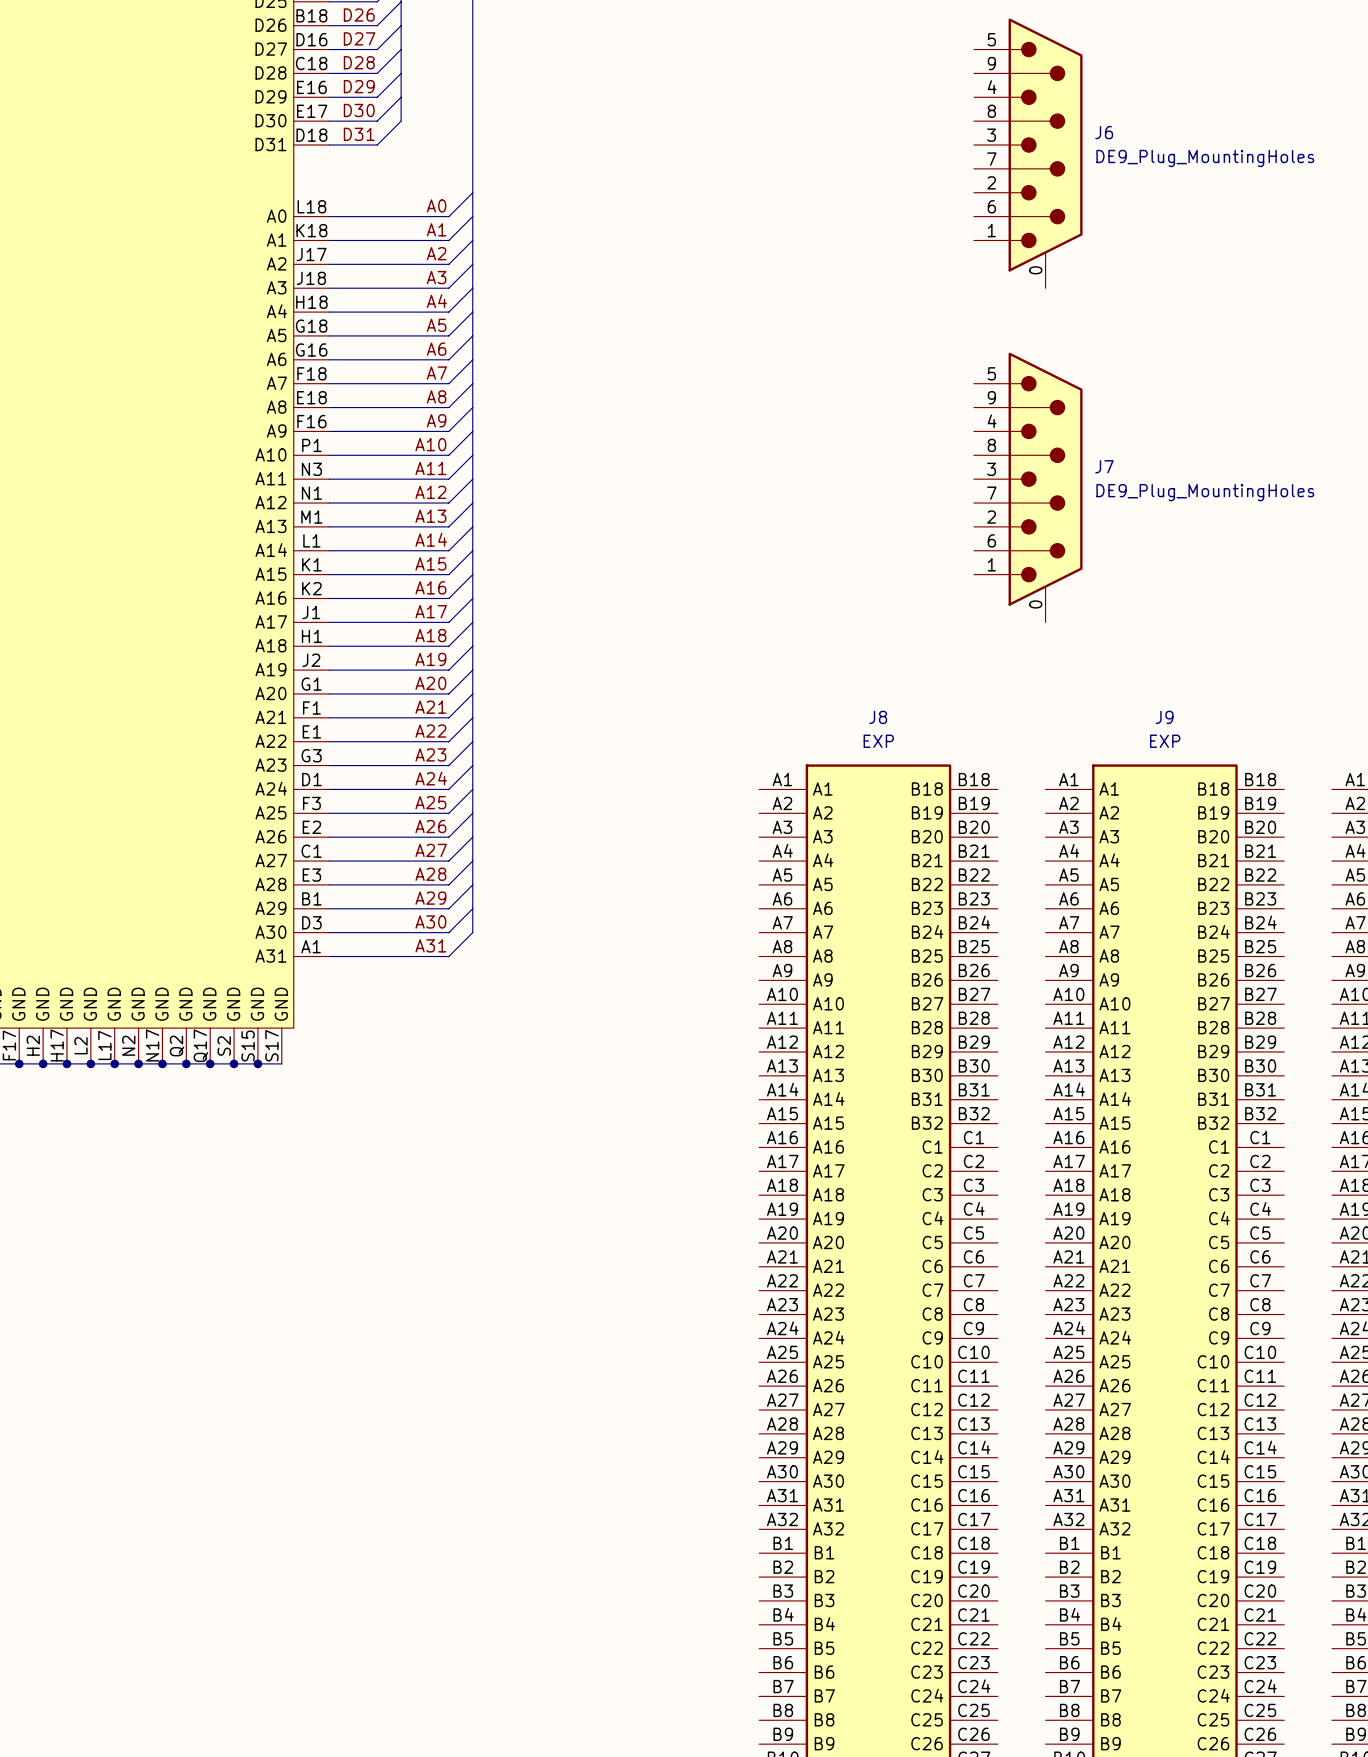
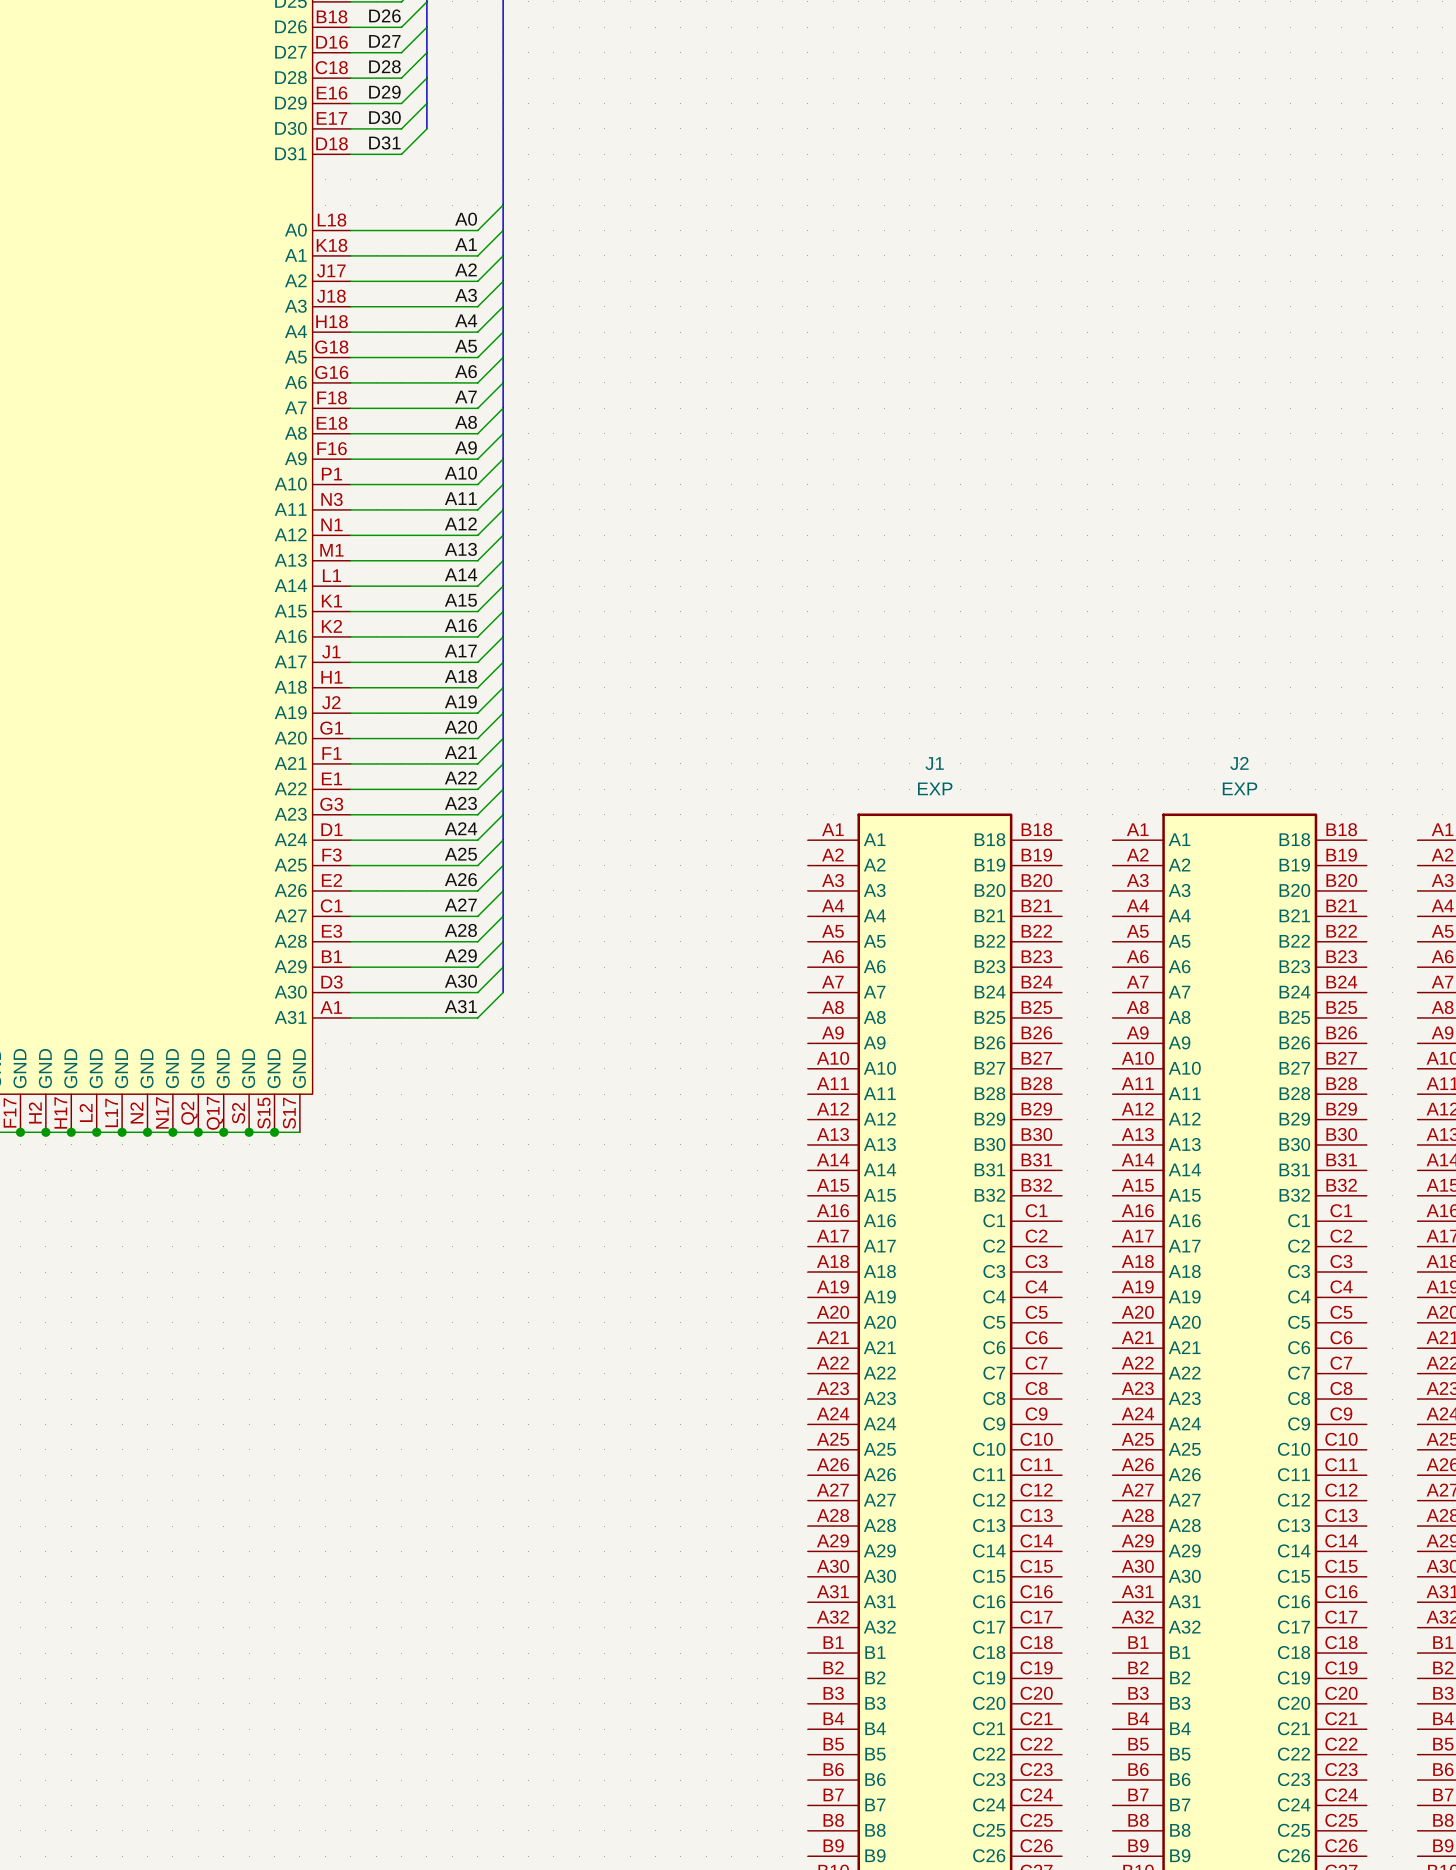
J6: DE9_Plug_MountingHoles (1028, 153) -> none
J7: DE9_Plug_MountingHoles (1028, 487) -> none
J8 name: J8 (878, 717) -> J1 (934, 763)
J9 name: J9 (1164, 717) -> J2 (1239, 763)

